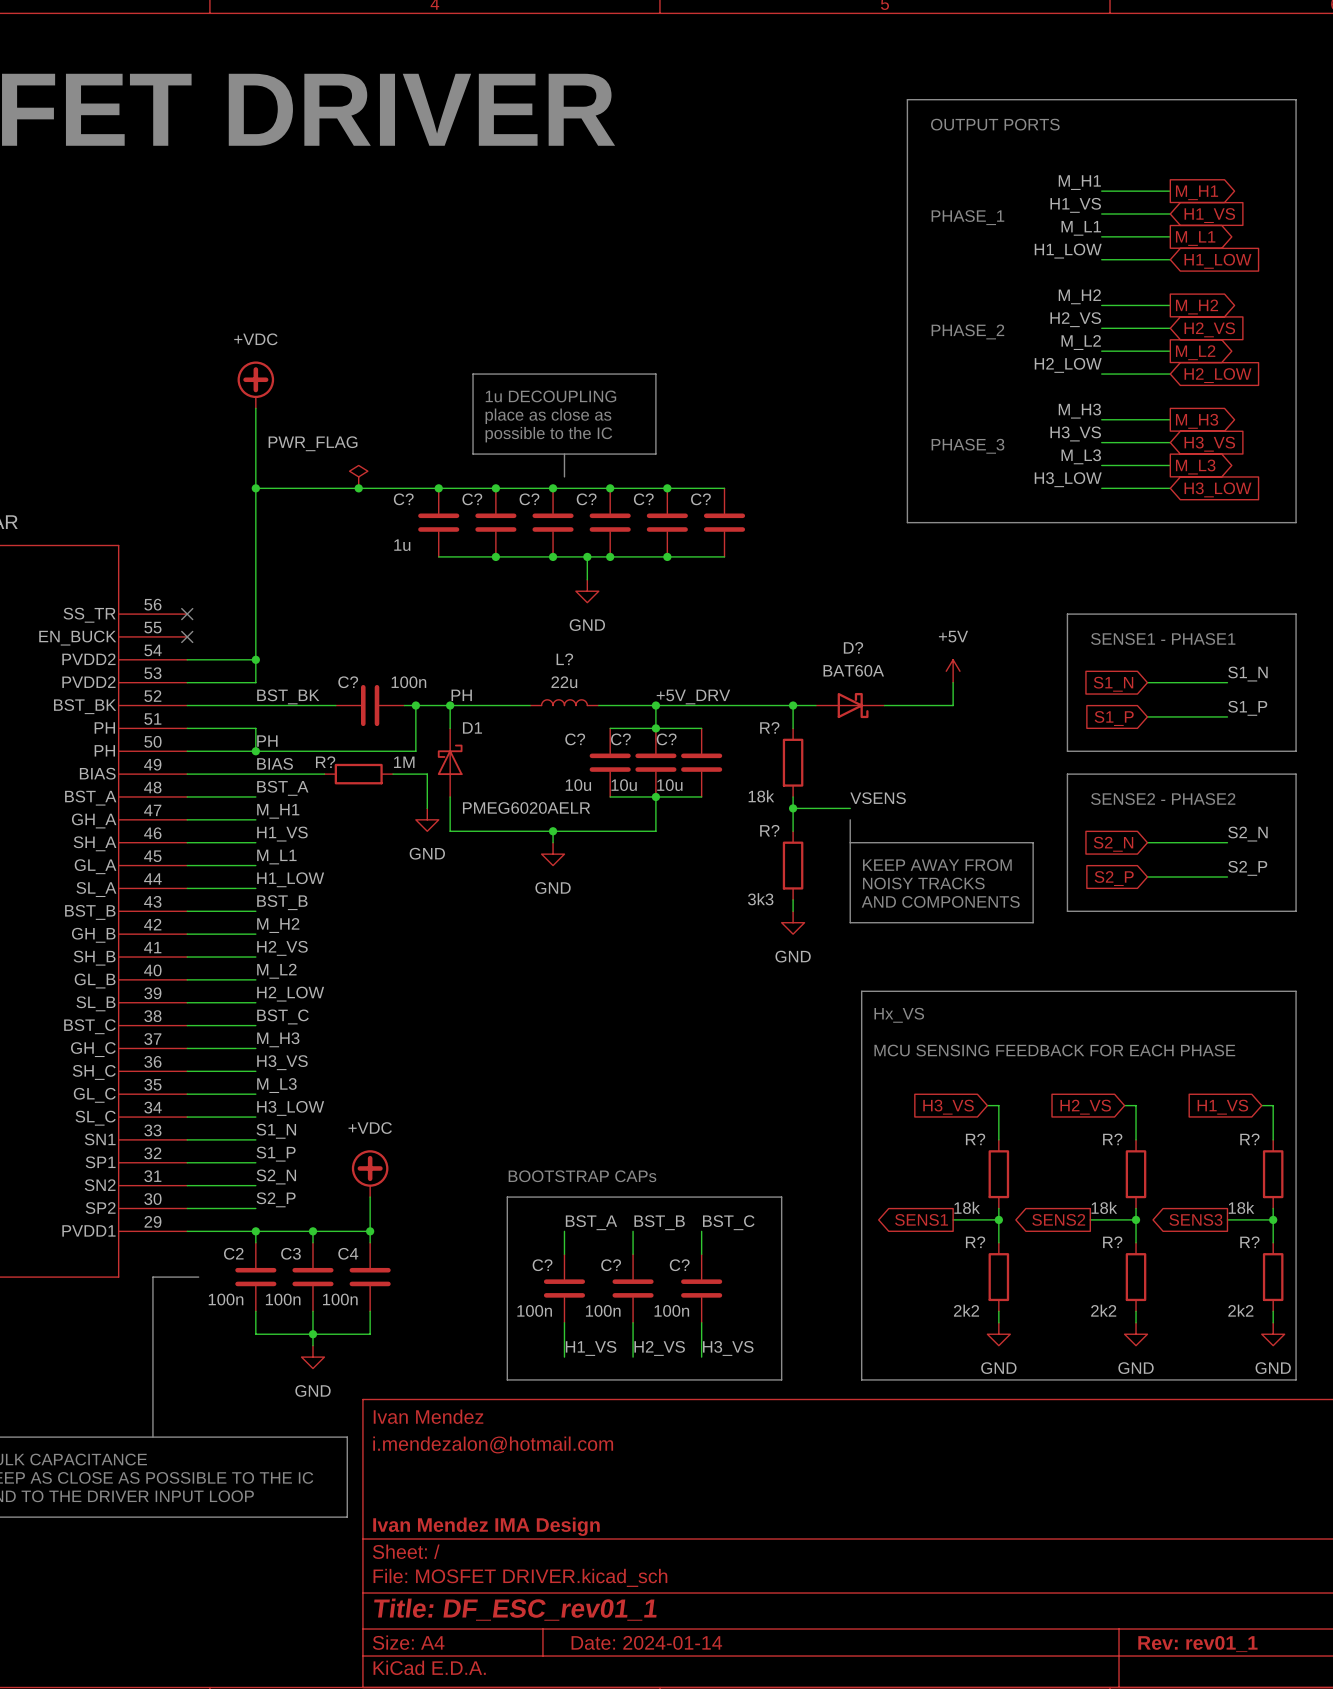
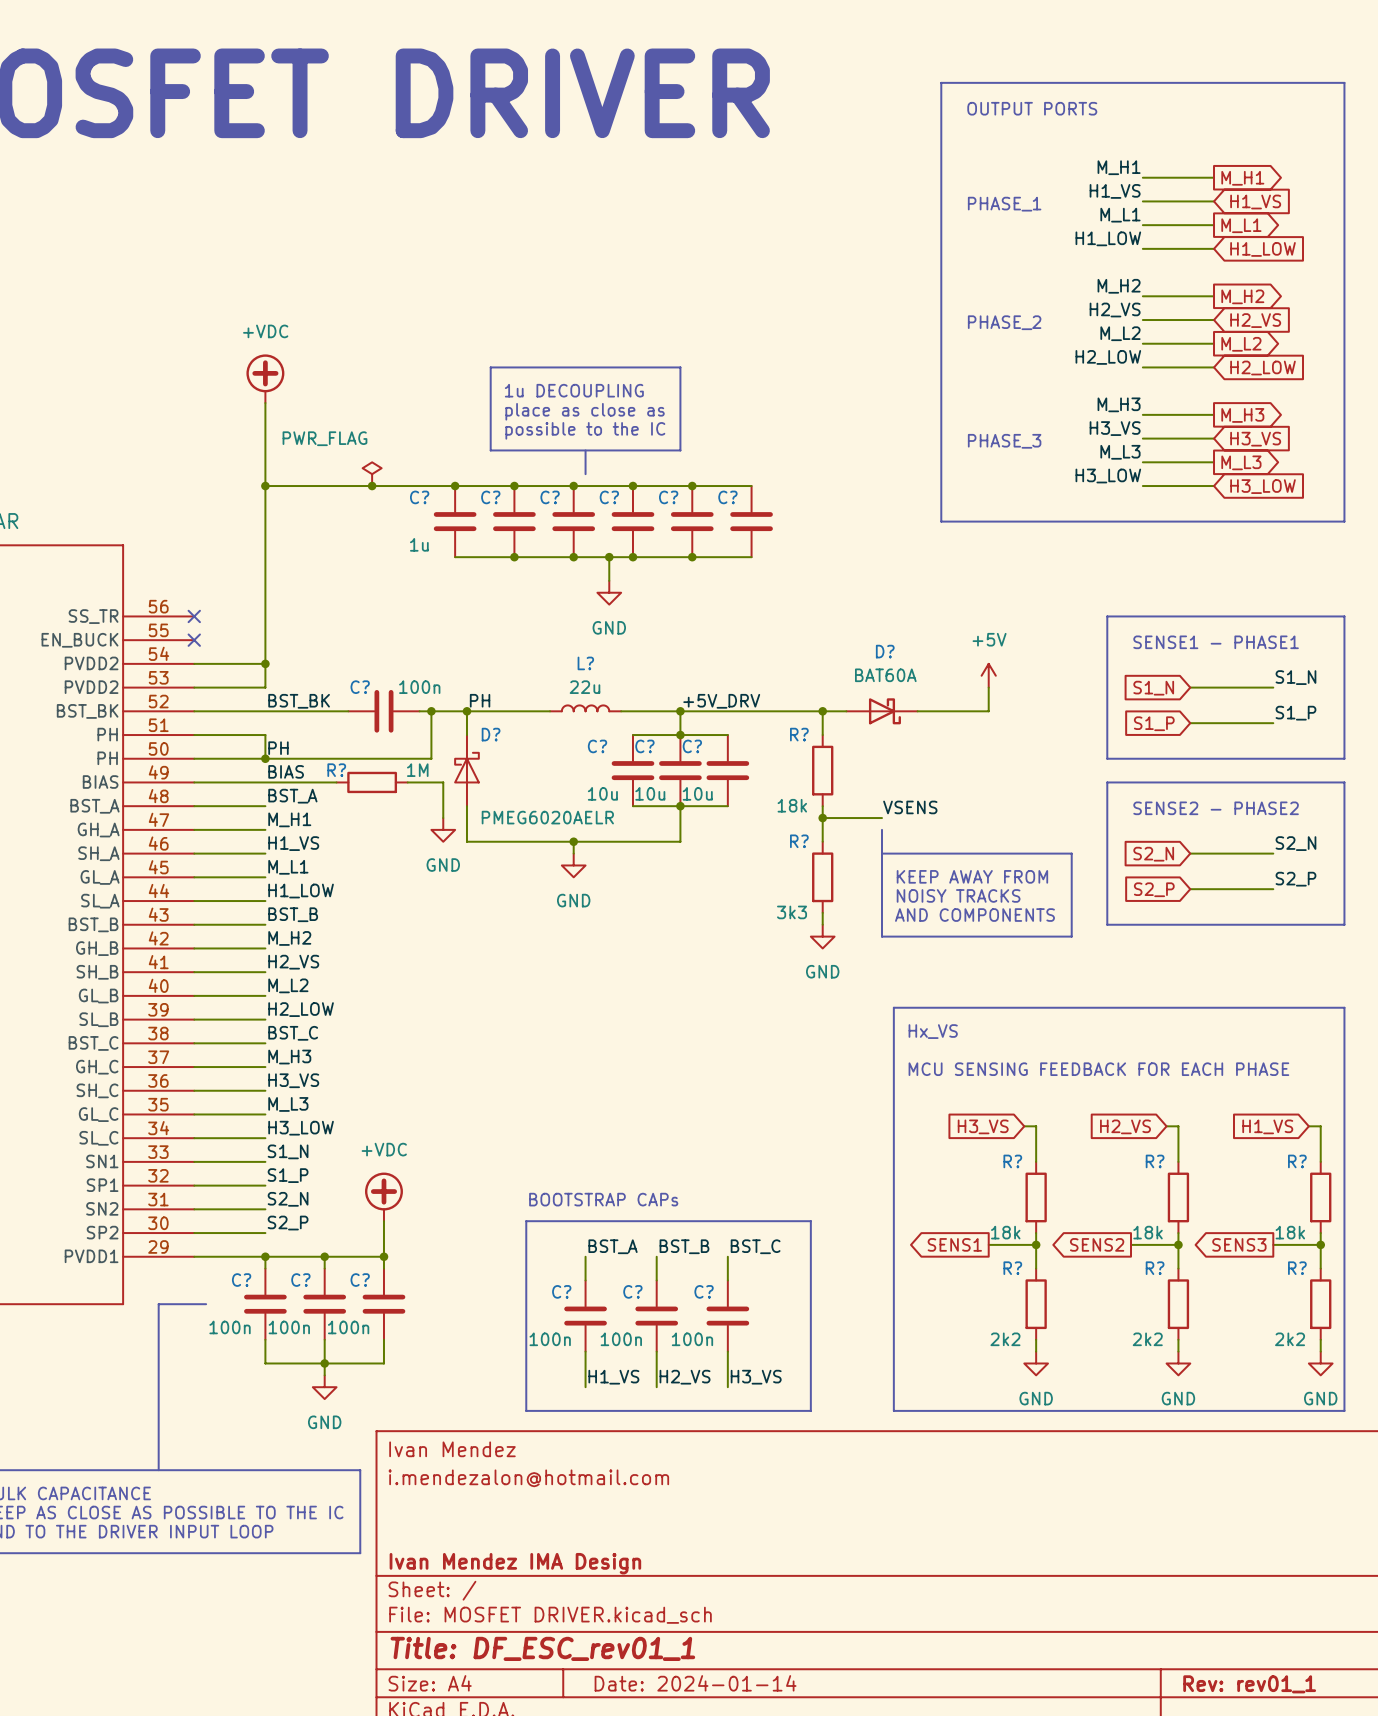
D1 name: D1 (472, 727) -> D? (491, 734)
C2 name: C2 (233, 1253) -> C? (241, 1280)
C3 name: C3 (290, 1253) -> C? (300, 1280)
C4 name: C4 (348, 1253) -> C? (360, 1280)

